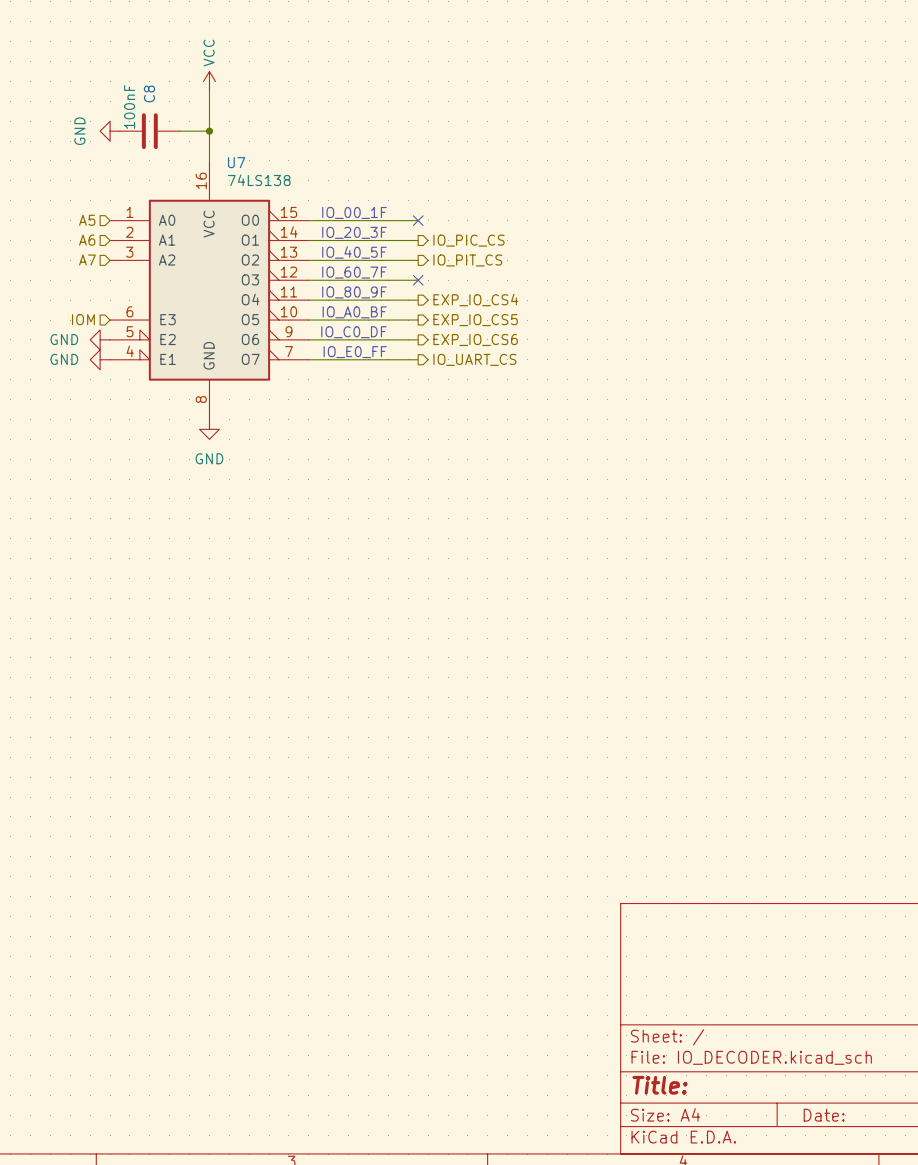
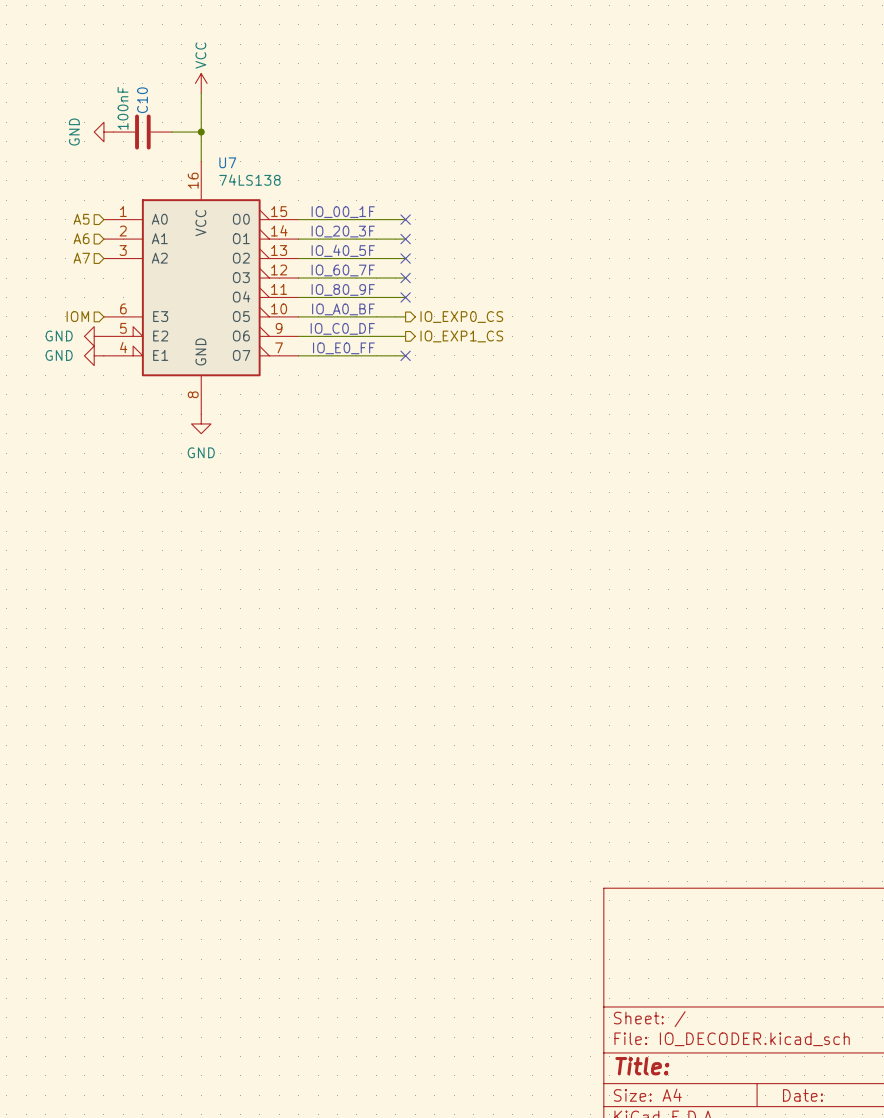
C8 name: C8 (149, 93) -> C10 (142, 100)
no-connect mark: none -> (405, 239)
hierarchical label: IO_PIC_CS (468, 240) -> none
no-connect mark: none -> (405, 258)
hierarchical label: IO_PIT_CS (467, 260) -> none
no-connect mark: none -> (405, 297)
hierarchical label: EXP_IO_CS4 (475, 300) -> none
hierarchical label: EXP_IO_CS5 (475, 320) -> IO_EXP0_CS (461, 317)
hierarchical label: EXP_IO_CS6 (475, 340) -> IO_EXP1_CS (461, 336)
no-connect mark: none -> (405, 355)
hierarchical label: IO_UART_CS (474, 359) -> none

